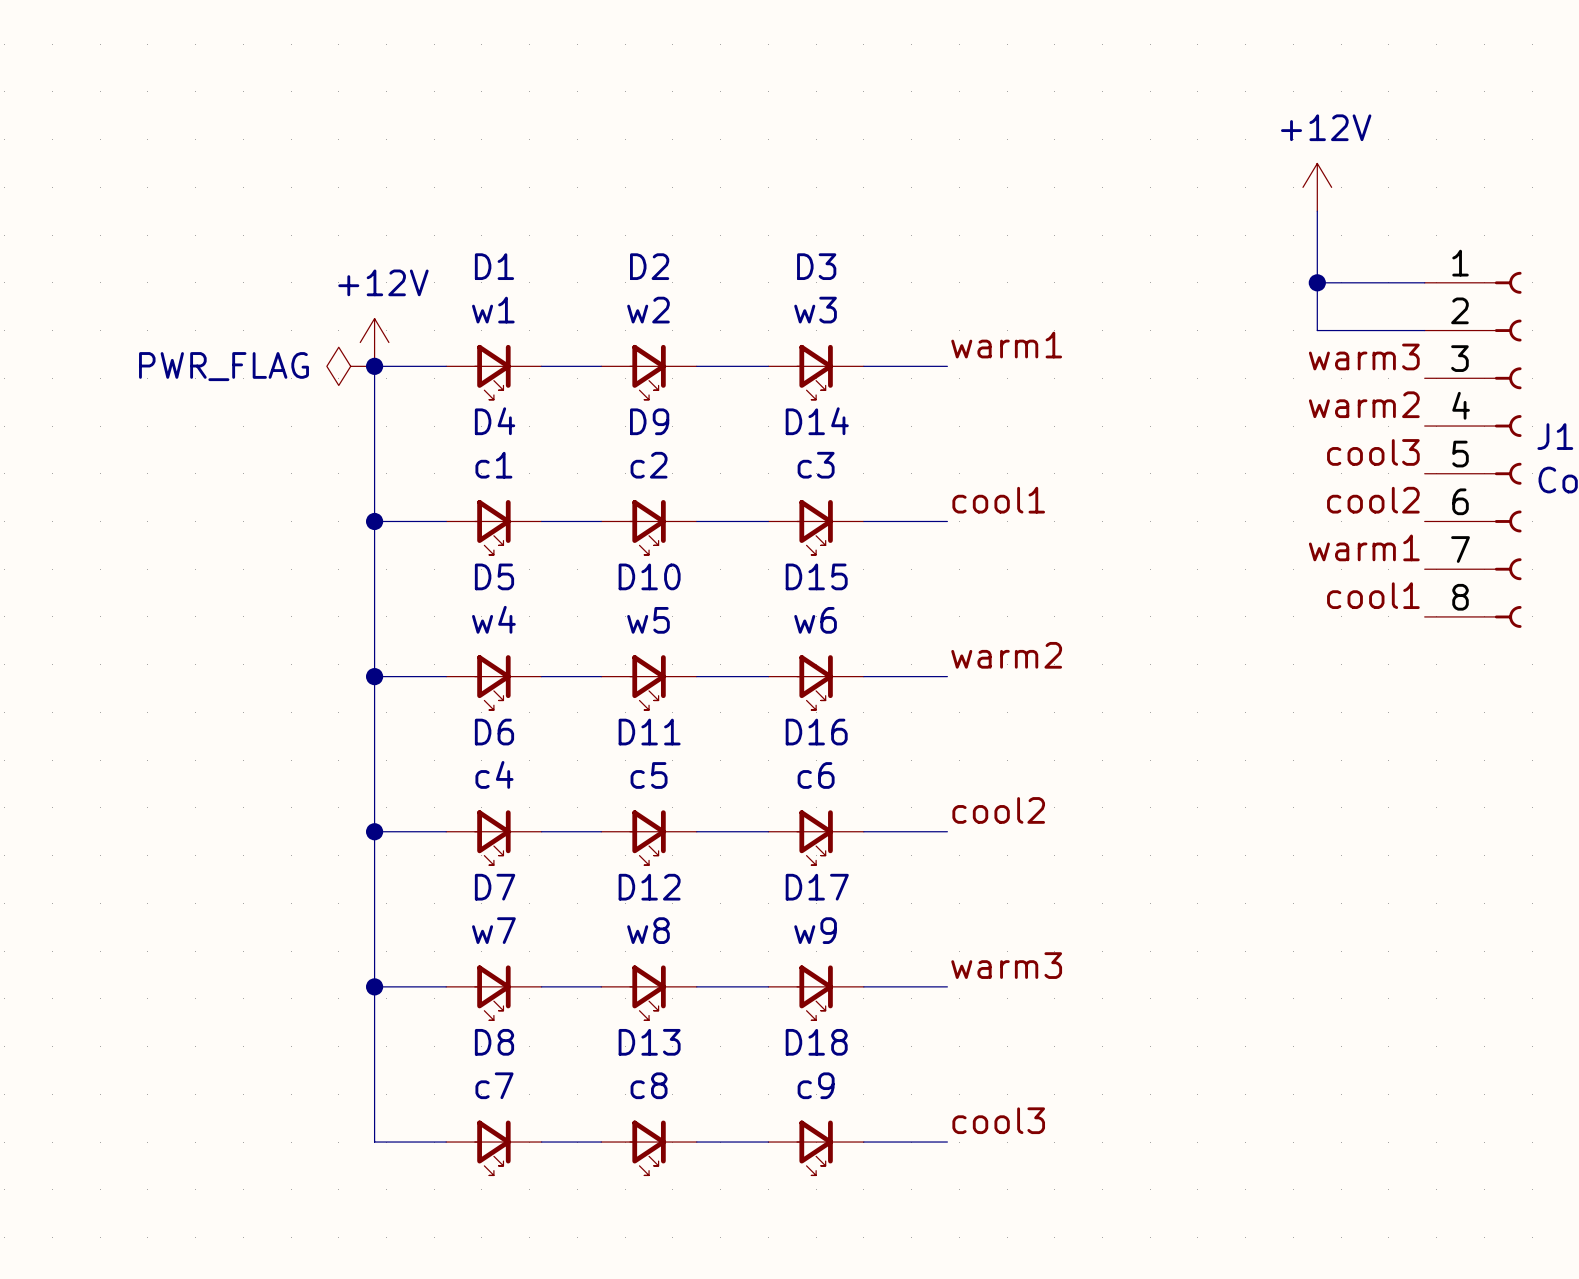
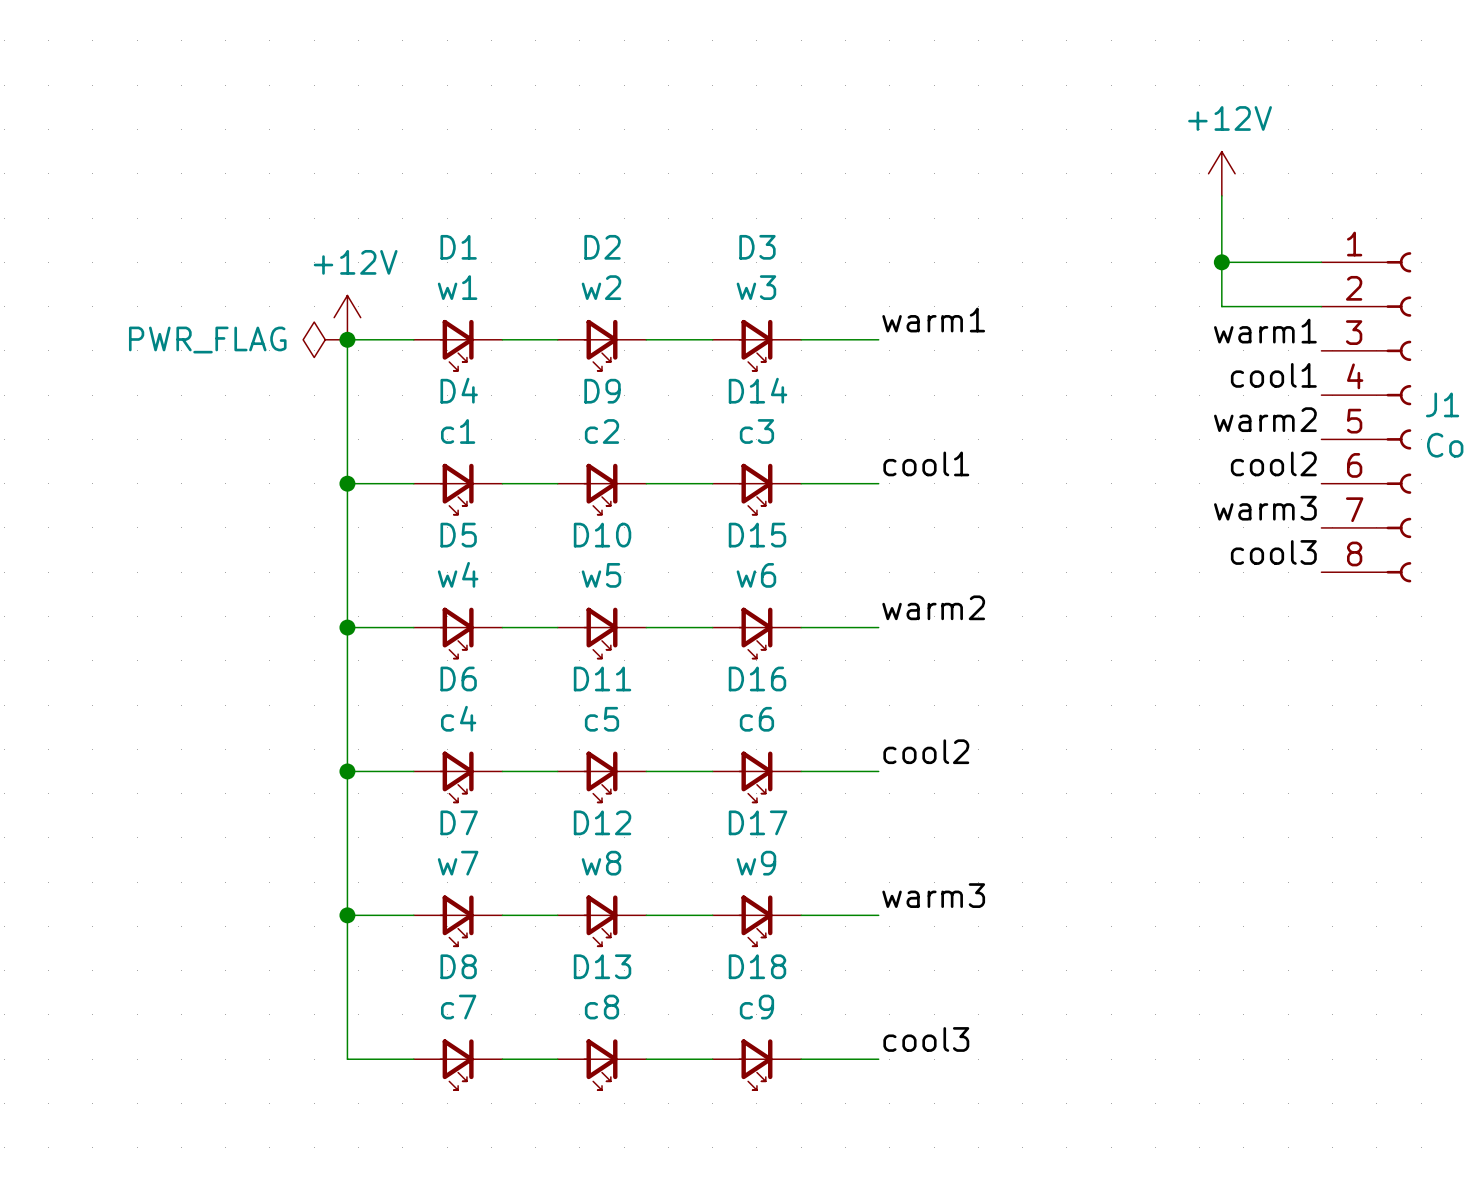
label: warm3 (1364, 356) -> warm1 (1265, 331)
label: warm2 (1364, 404) -> cool1 (1273, 375)
label: cool3 (1373, 452) -> warm2 (1265, 419)
label: warm1 (1364, 547) -> warm3 (1265, 508)
label: cool1 (1373, 595) -> cool3 (1273, 552)

